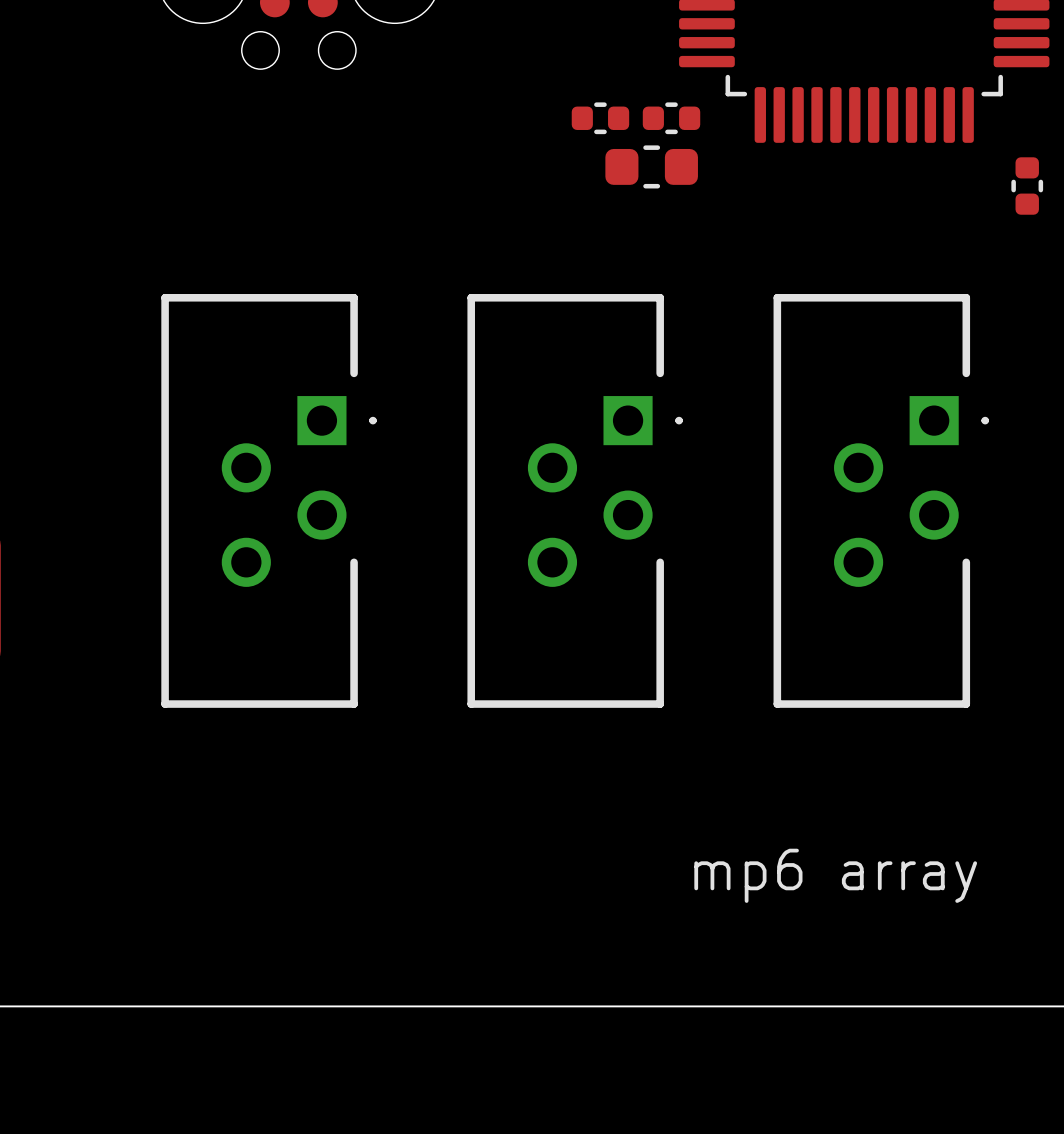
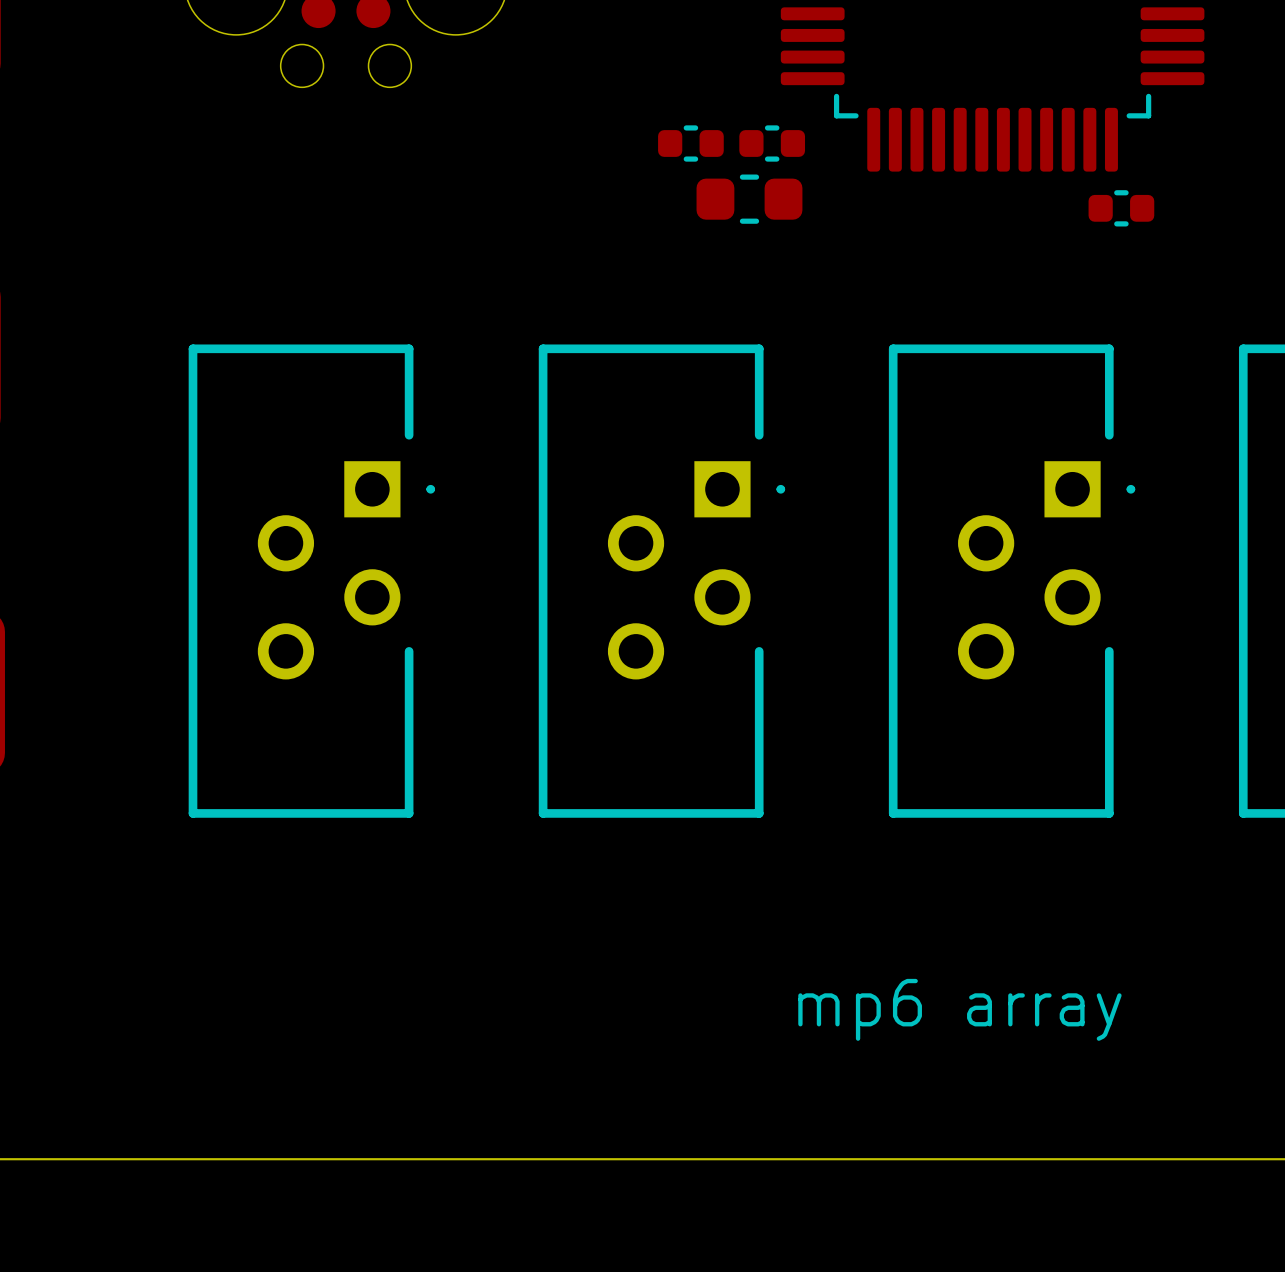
part rotation: 0° (1027, 186) -> 90° clockwise (1121, 208)
part position: (1027, 186) -> (1121, 208)

